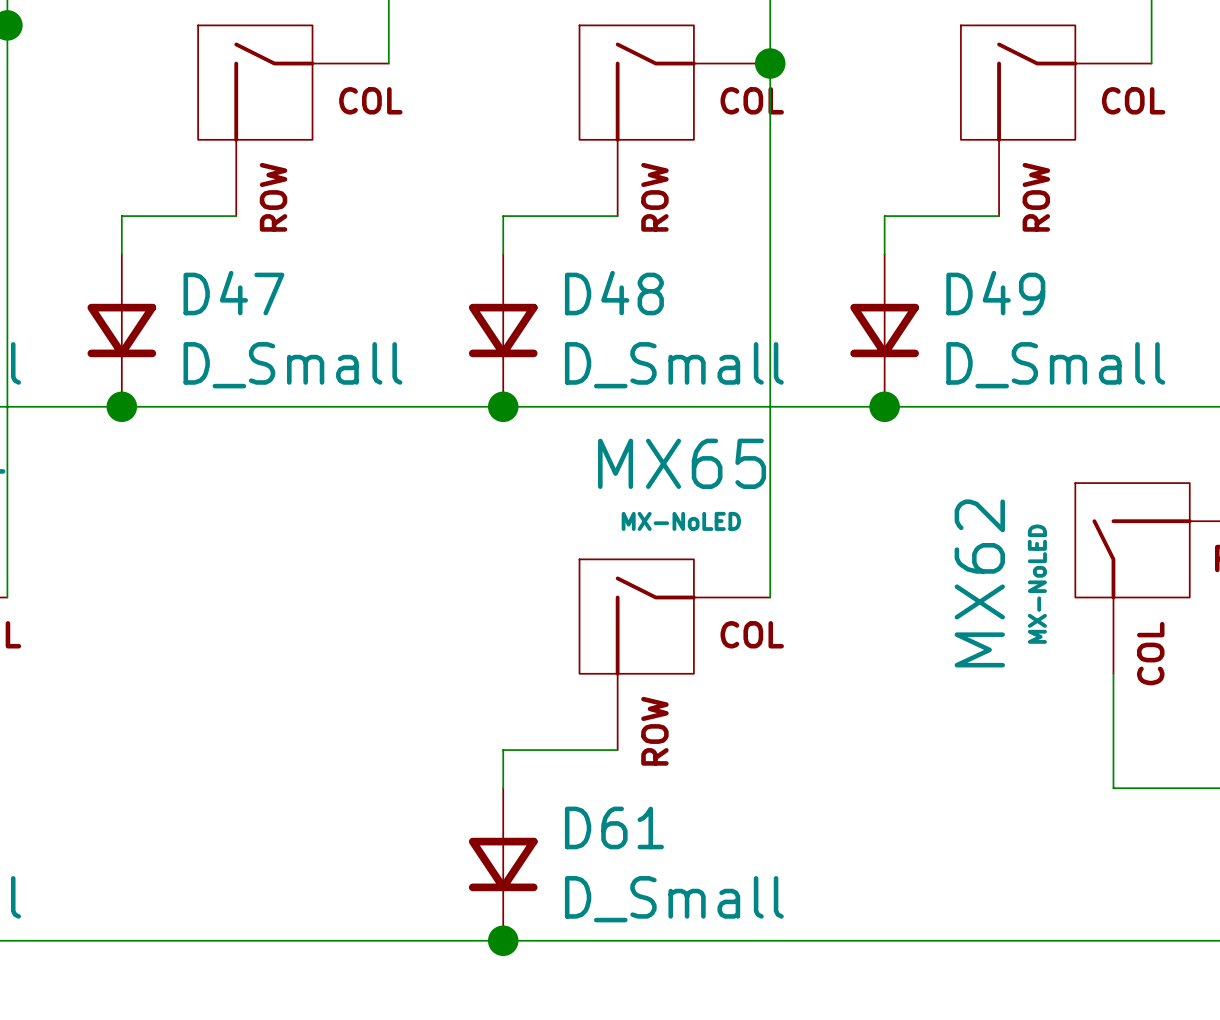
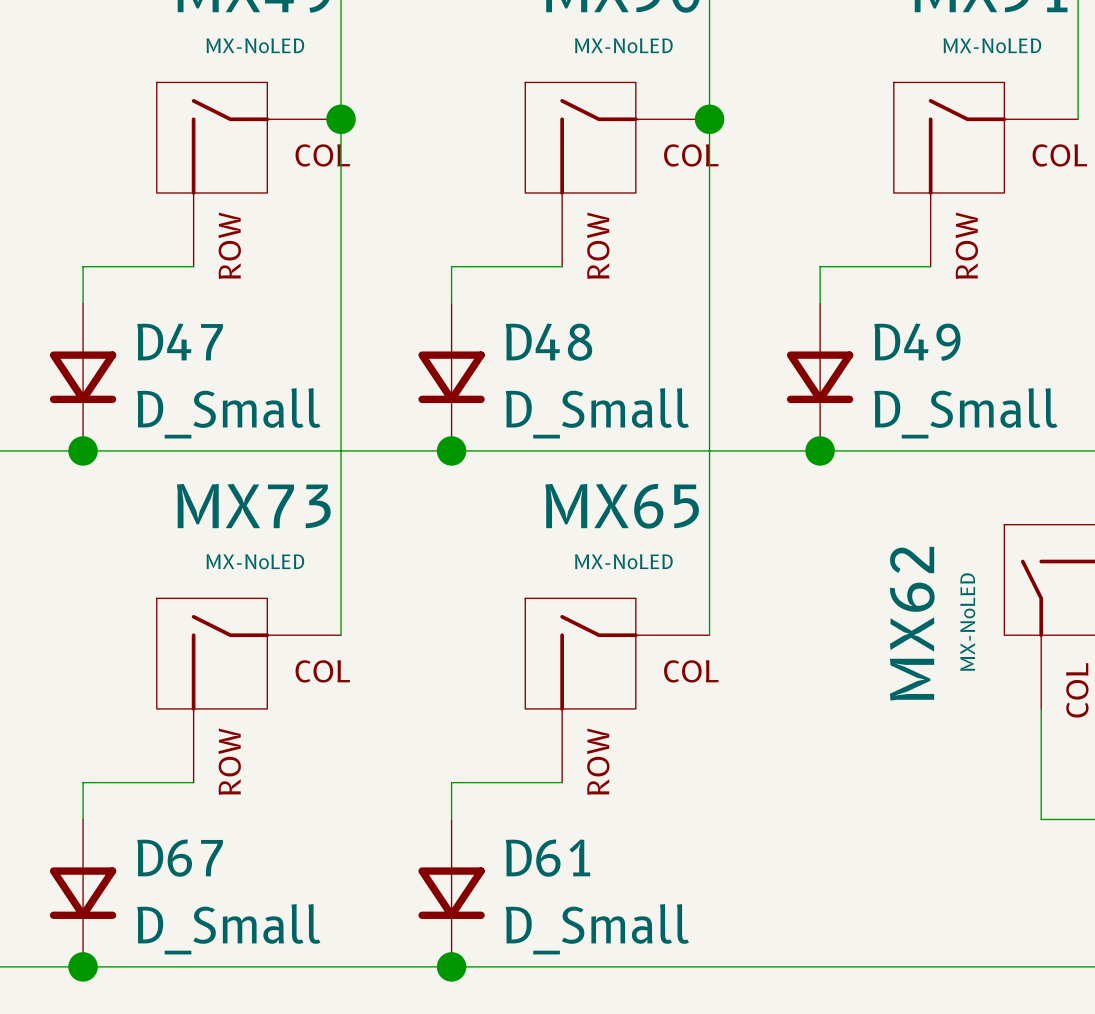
wire: none -> (341, 119) (341, 635)
junction: none -> (341, 119)
MX73: none -> MX-NoLED (248, 690)
wire: none -> (193, 782) (83, 782) (83, 819)
D67: none -> D_Small (83, 893)
junction: none -> (83, 966)

